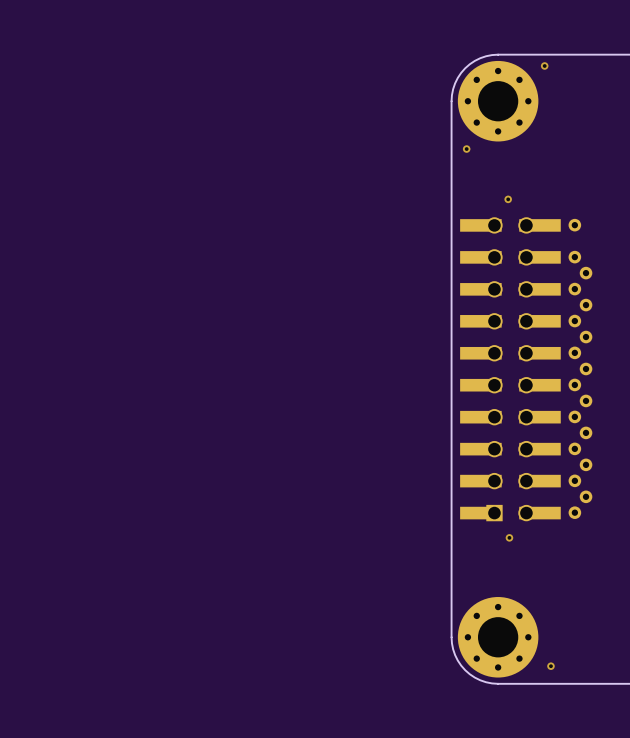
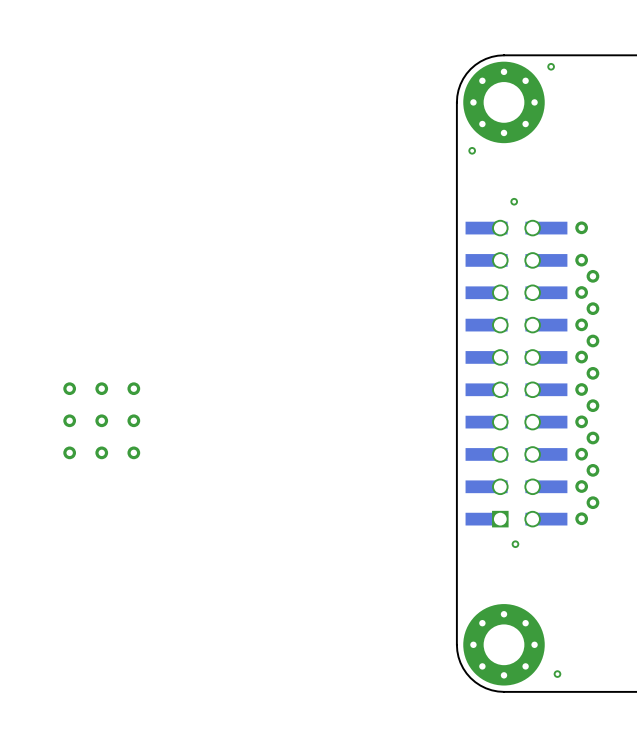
part: none -> (69, 388)
part: none -> (101, 388)
part: none -> (133, 388)
part: none -> (69, 420)
part: none -> (101, 420)
part: none -> (133, 420)
part: none -> (69, 452)
part: none -> (101, 452)
part: none -> (133, 452)

